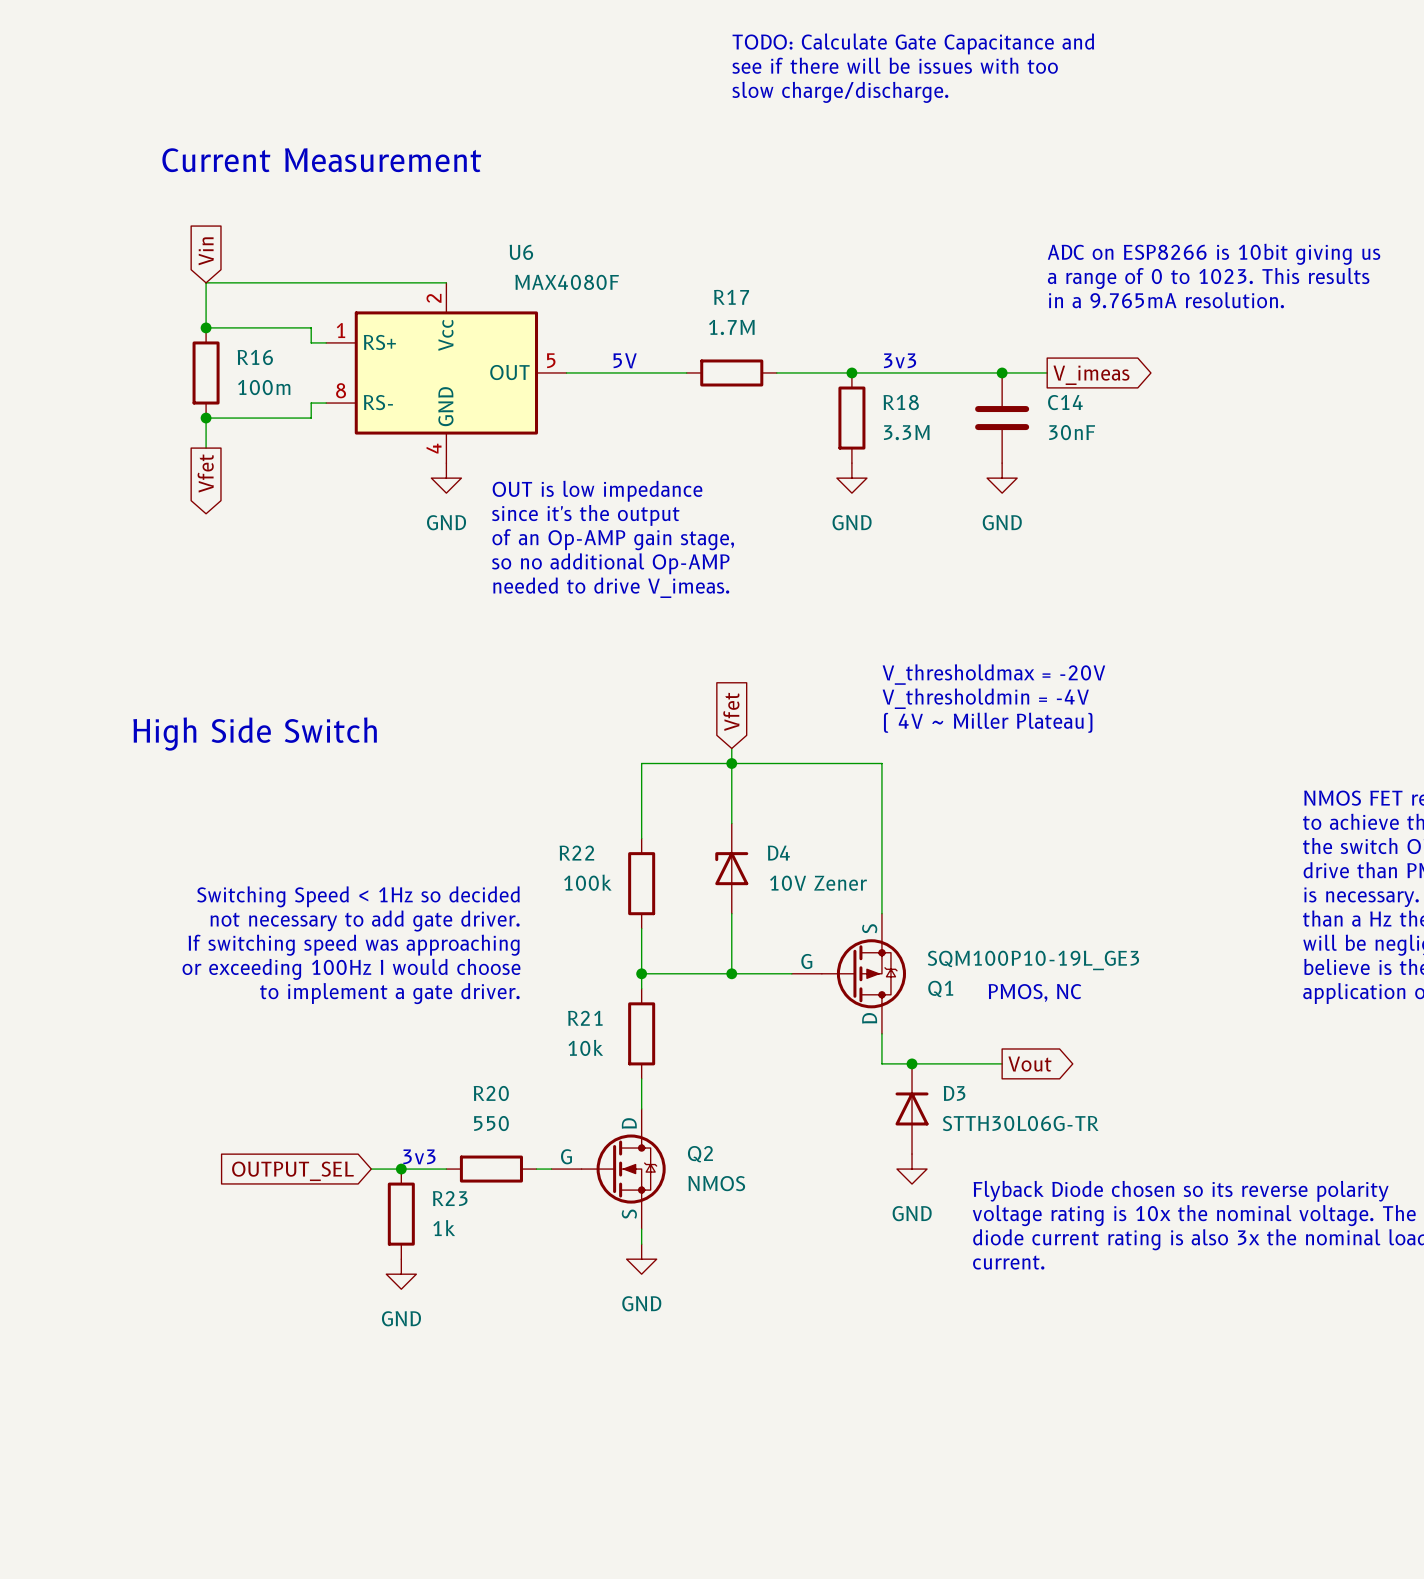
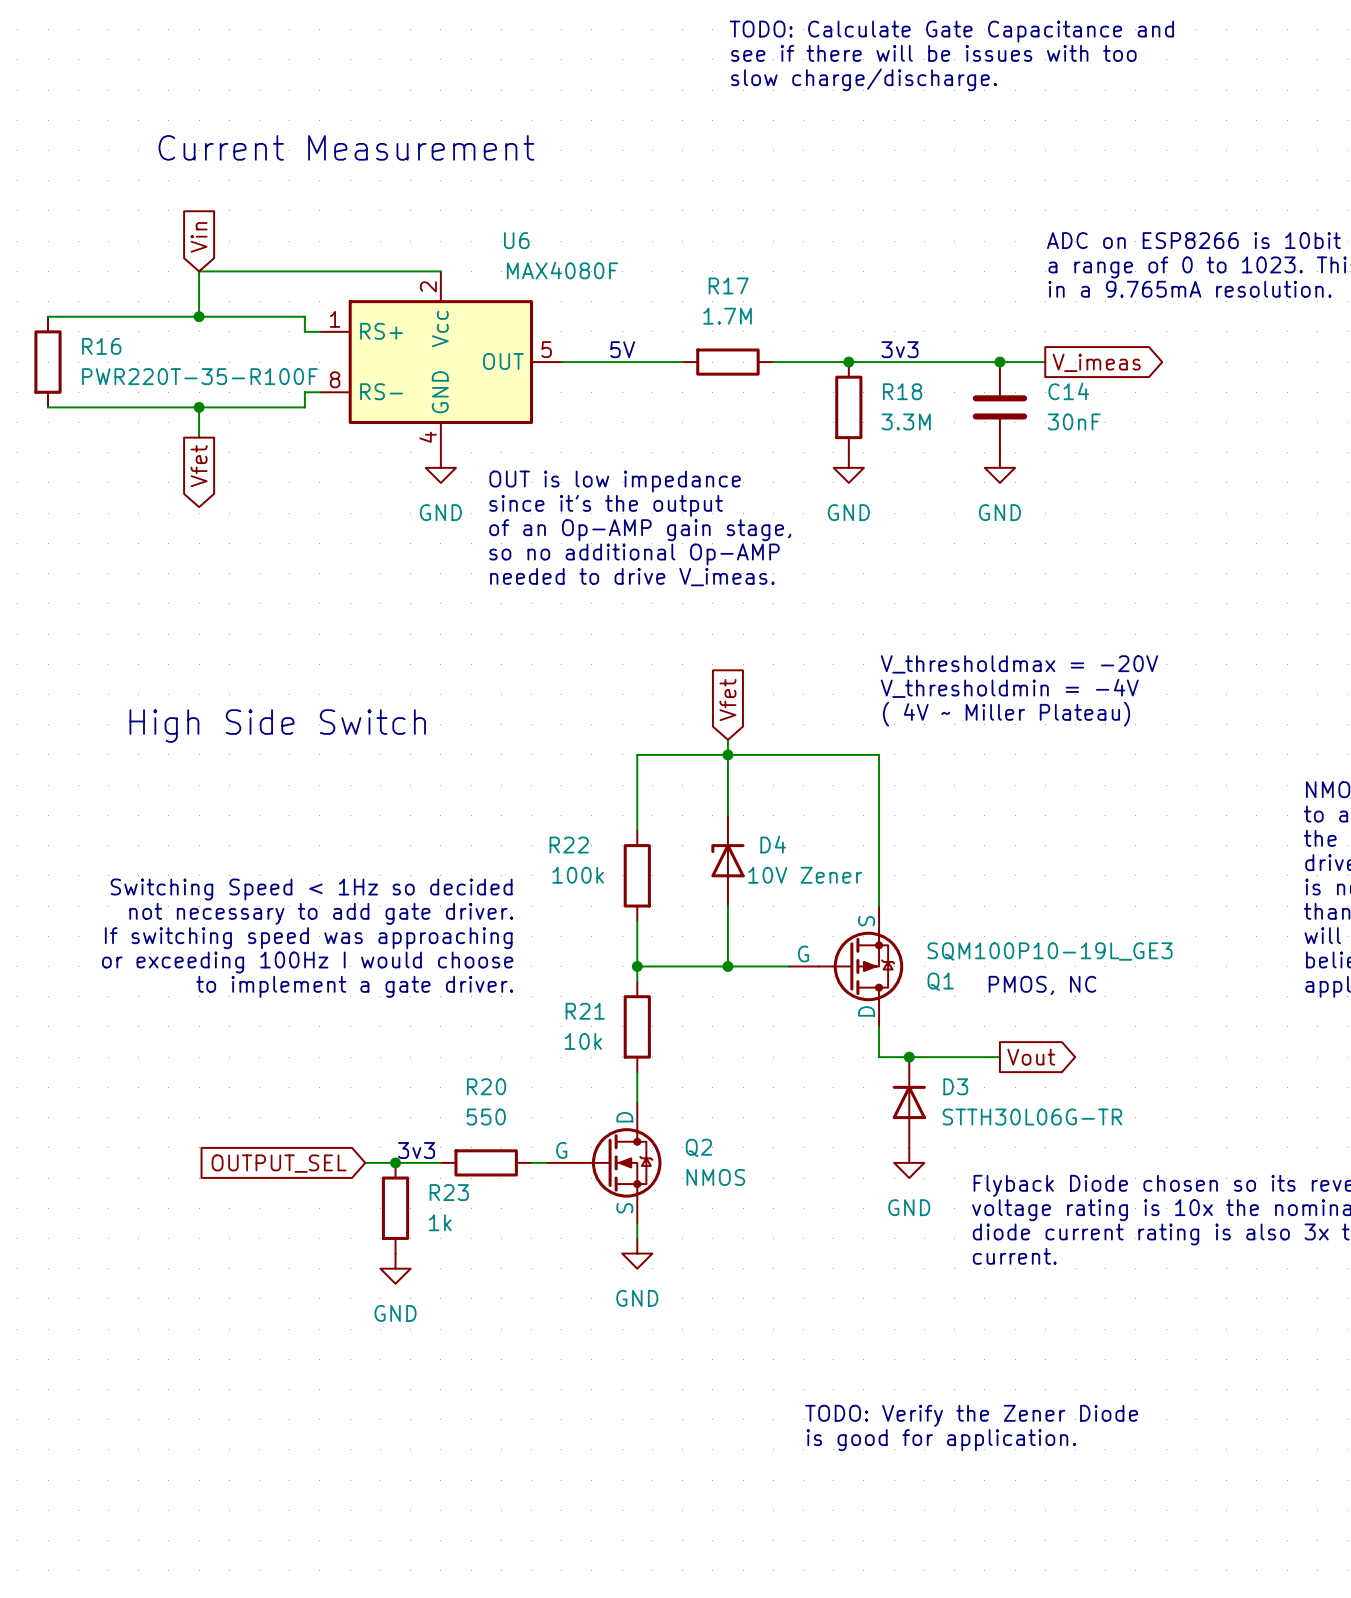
wire: none -> (48, 316) (199, 316)
R16 position: (206, 372) -> (48, 362)
R16 value: 100m (264, 387) -> PWR220T-35-R100F (199, 376)
wire: none -> (48, 407) (199, 407)
text: none -> TODO: Verify the Zener Diode (971, 1415)
text: none -> is good for application. (941, 1440)

